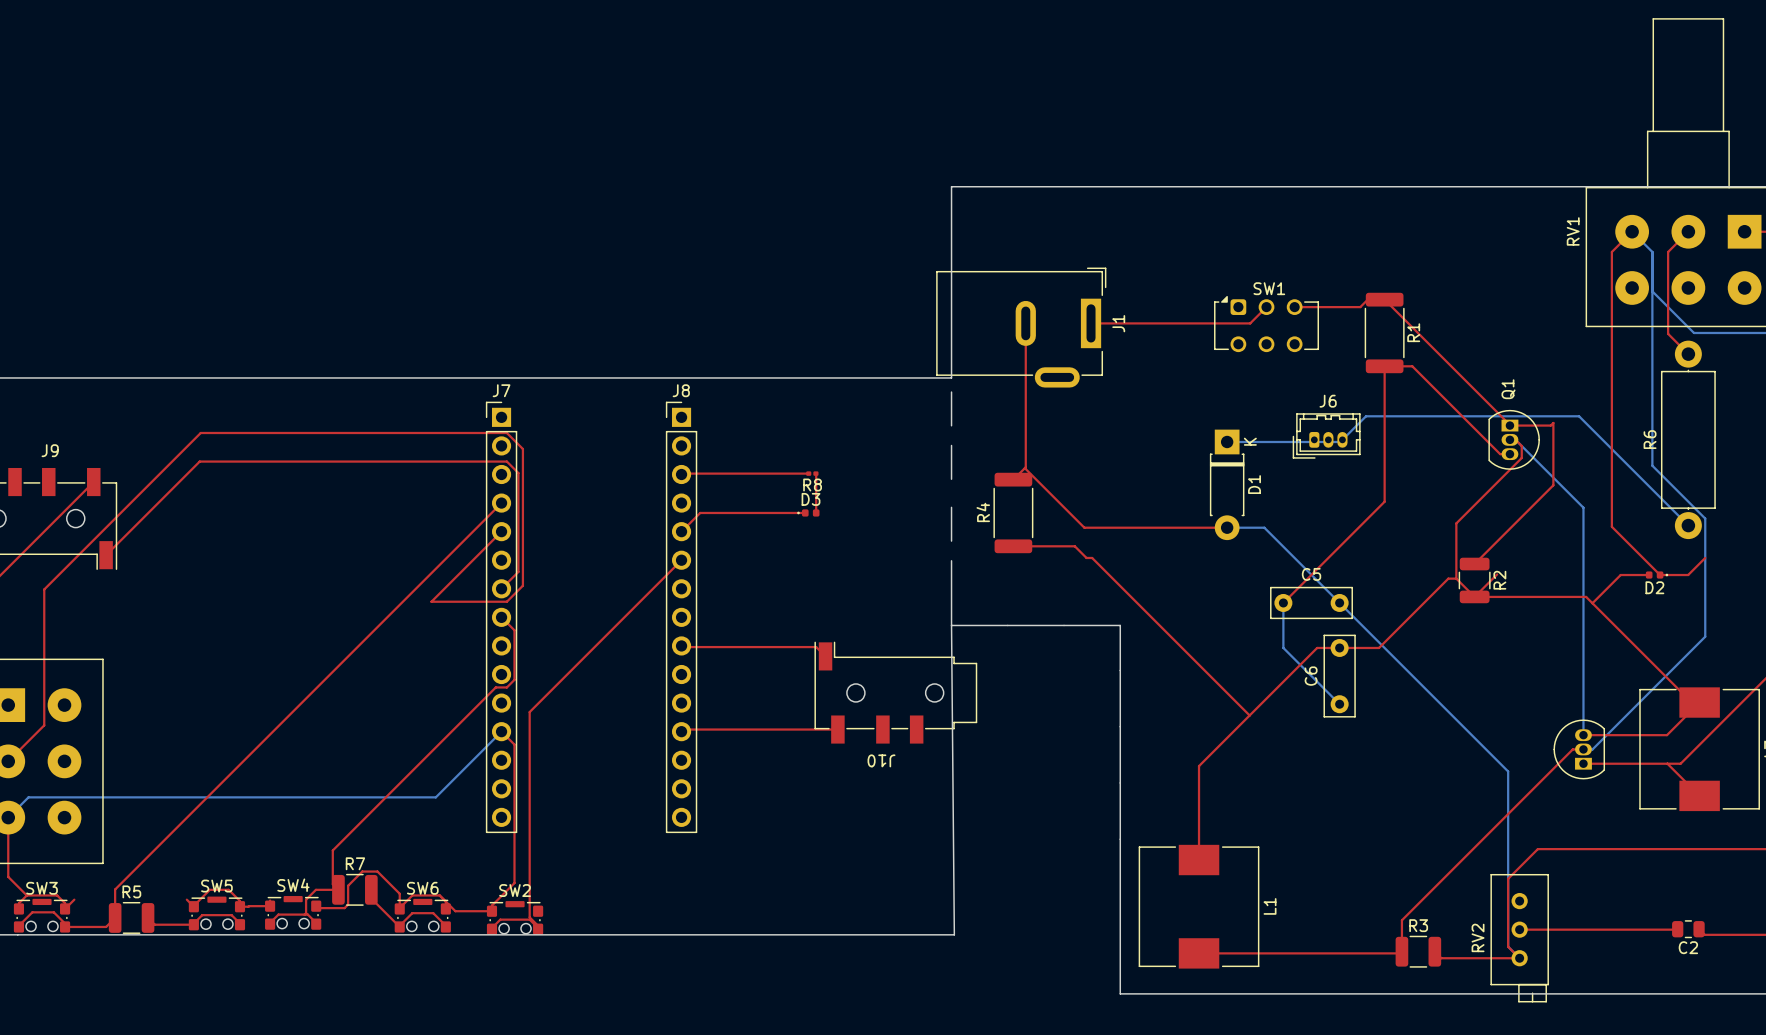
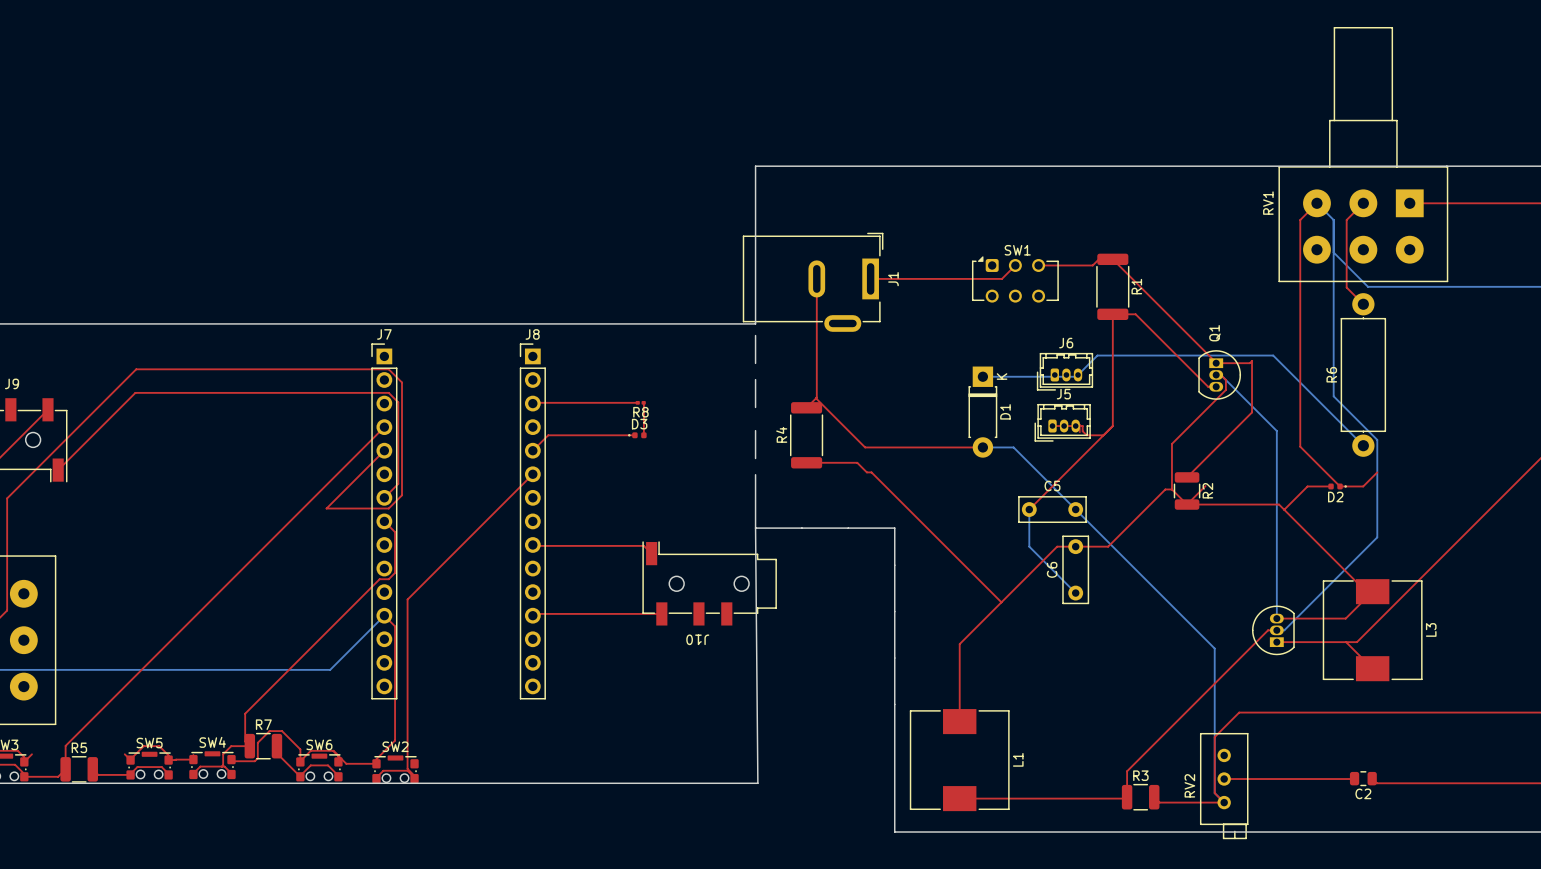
J5: none -> (1062, 422)
top track: none -> (1052, 426) (1082, 426) (1082, 431) (1086, 435) (1103, 435)
top track: none -> (1075, 426) (1079, 424) (1079, 432)

